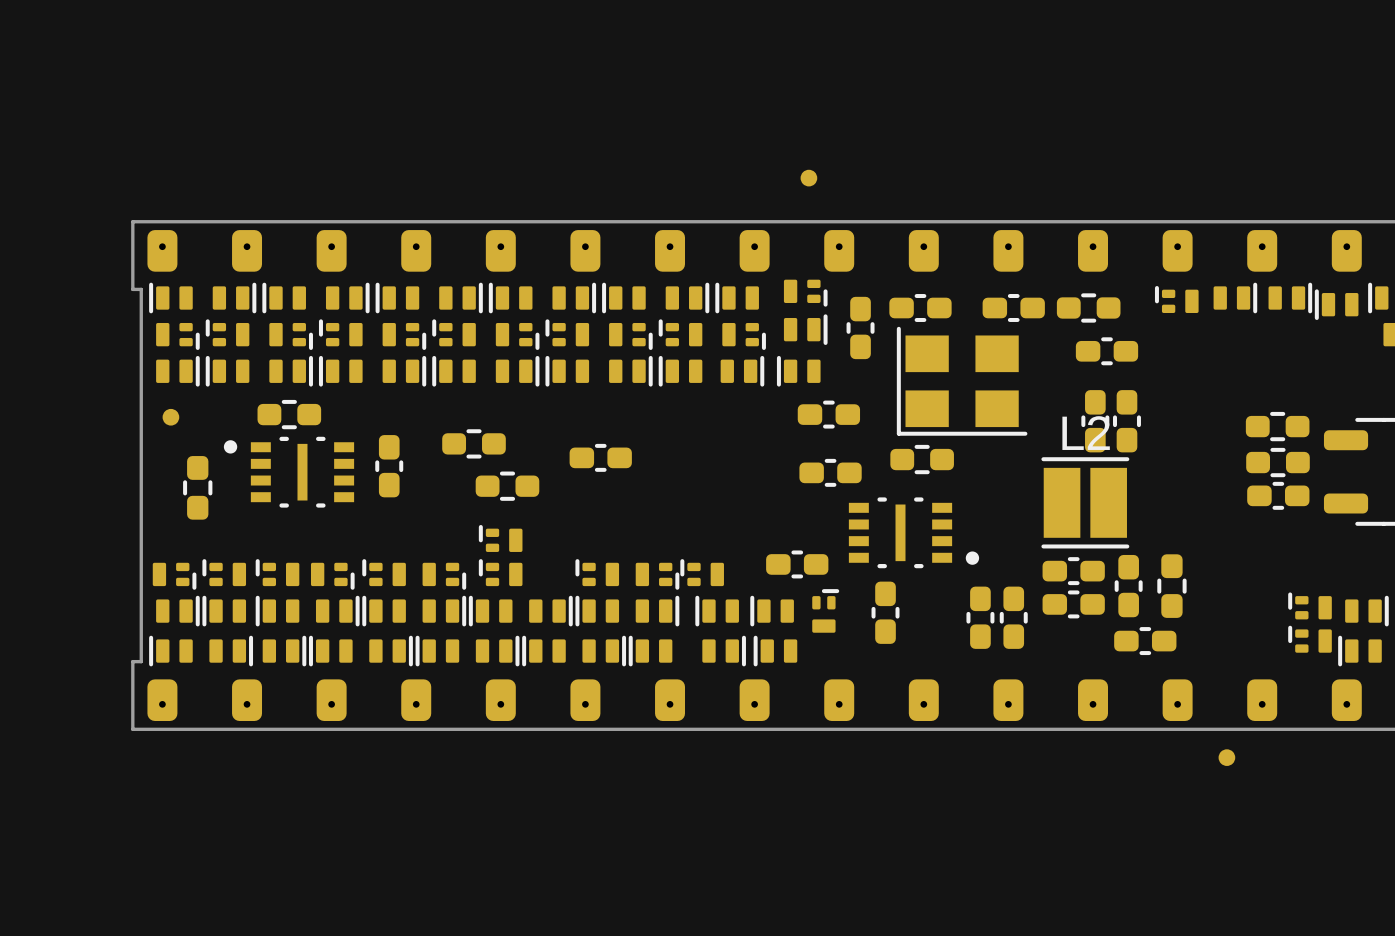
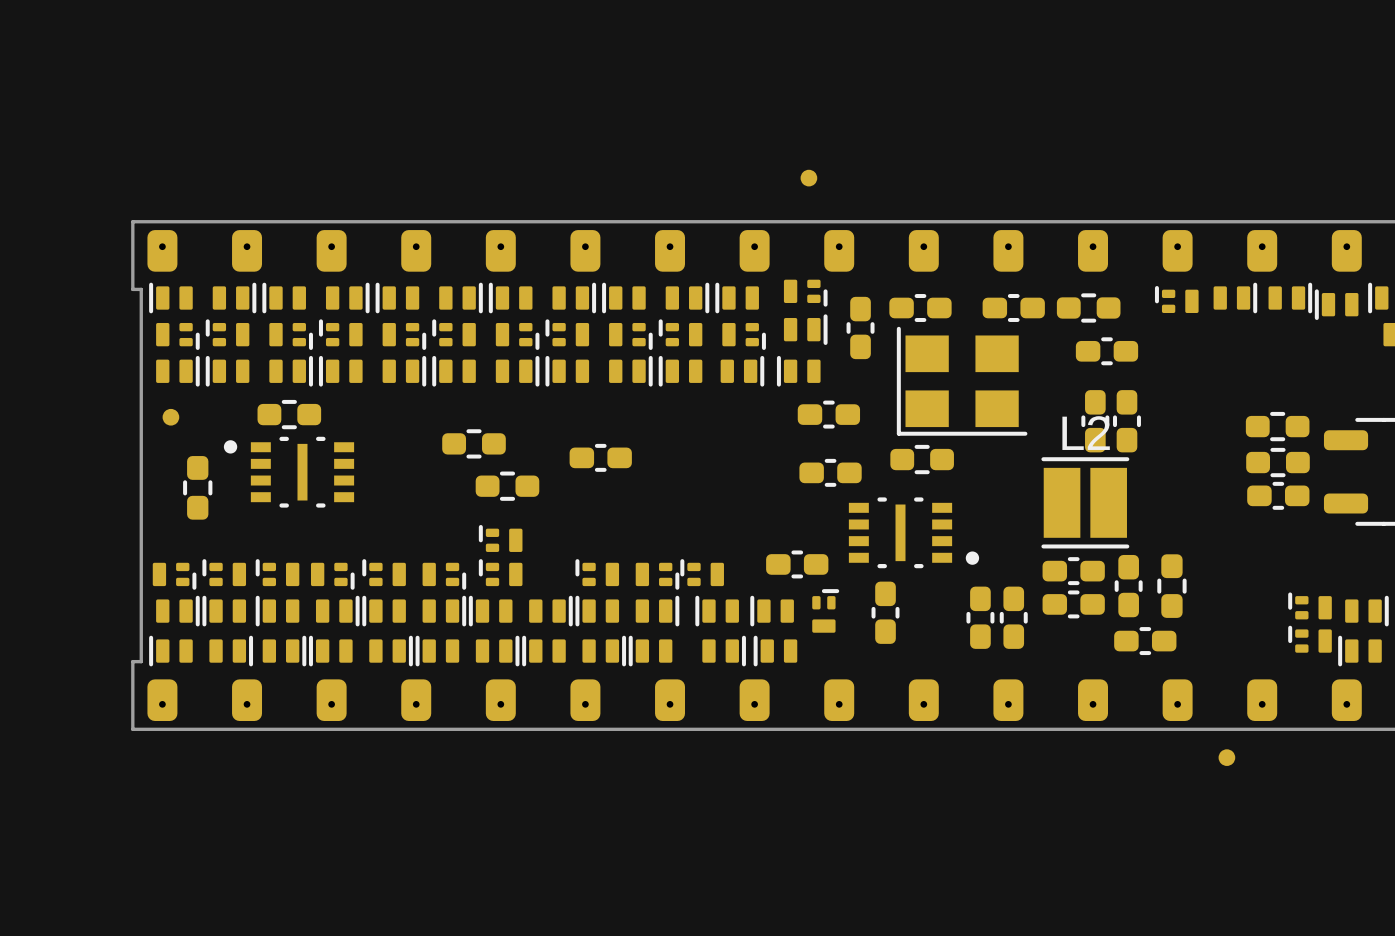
part: (389, 466) -> none

